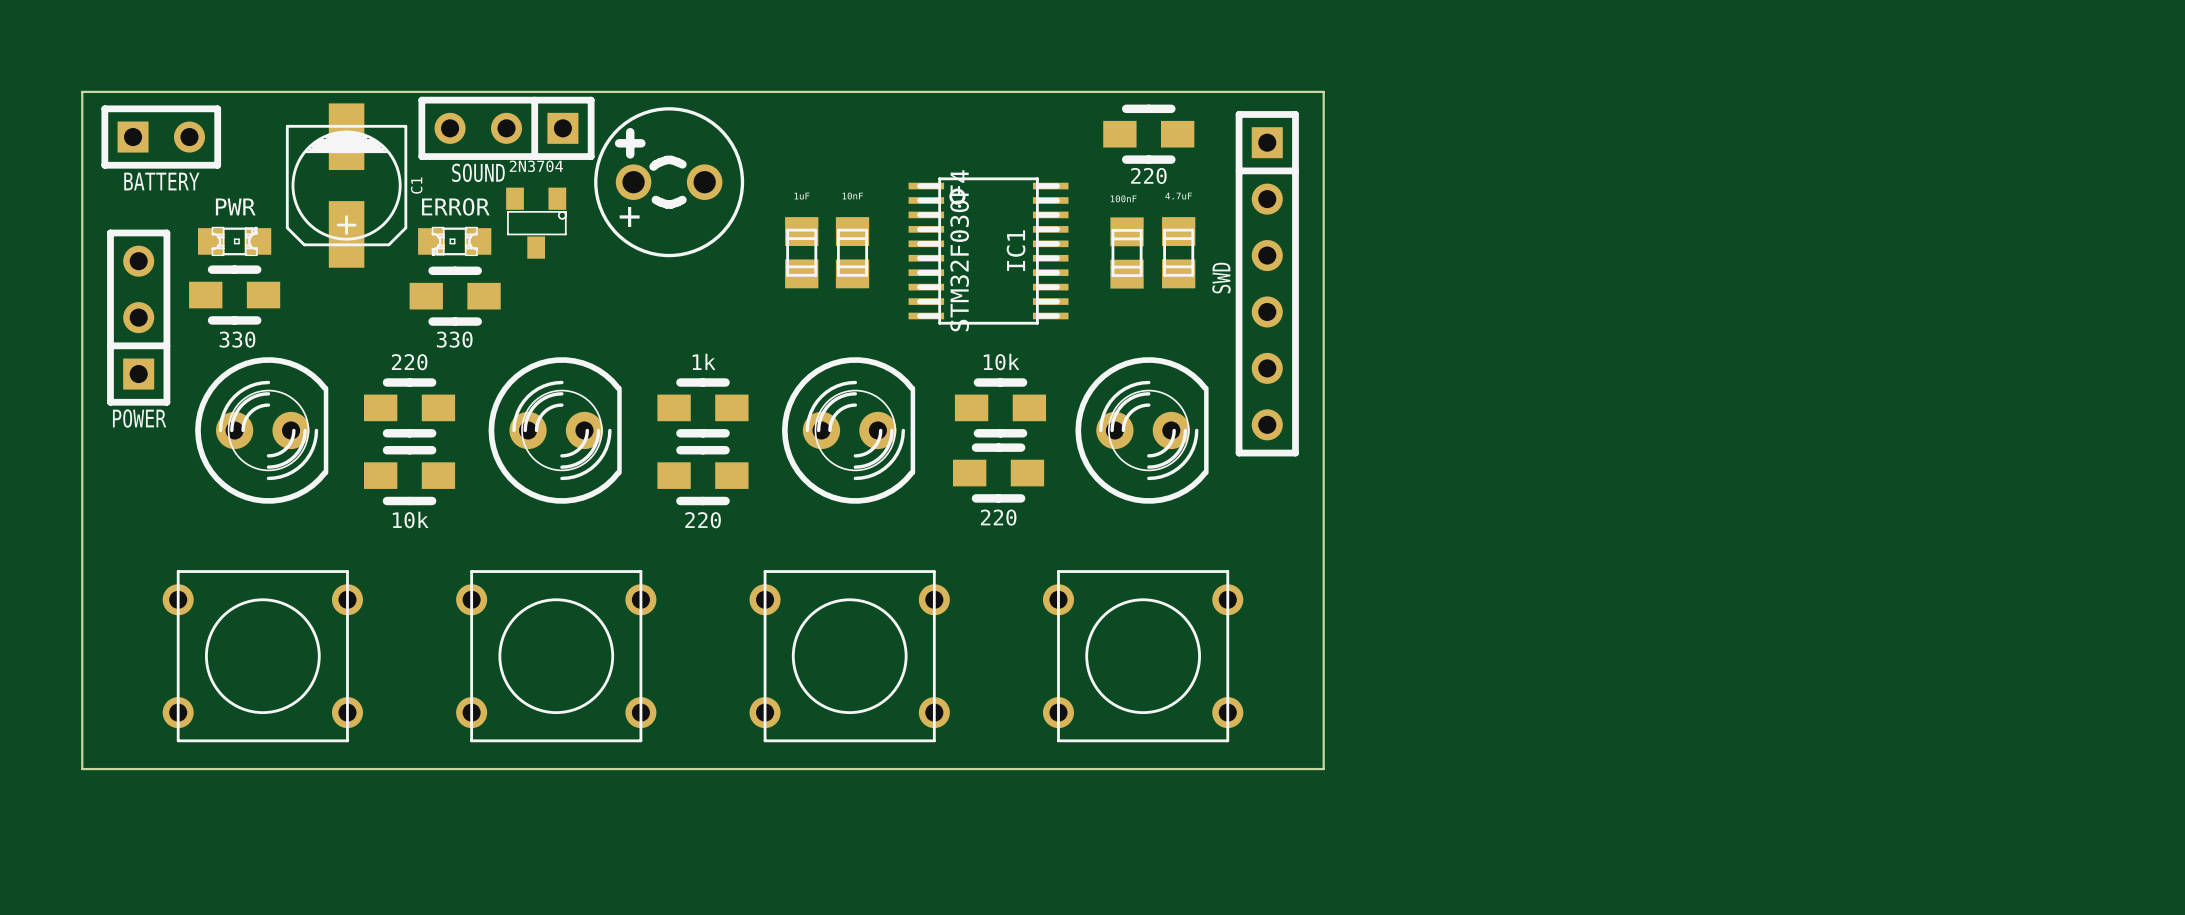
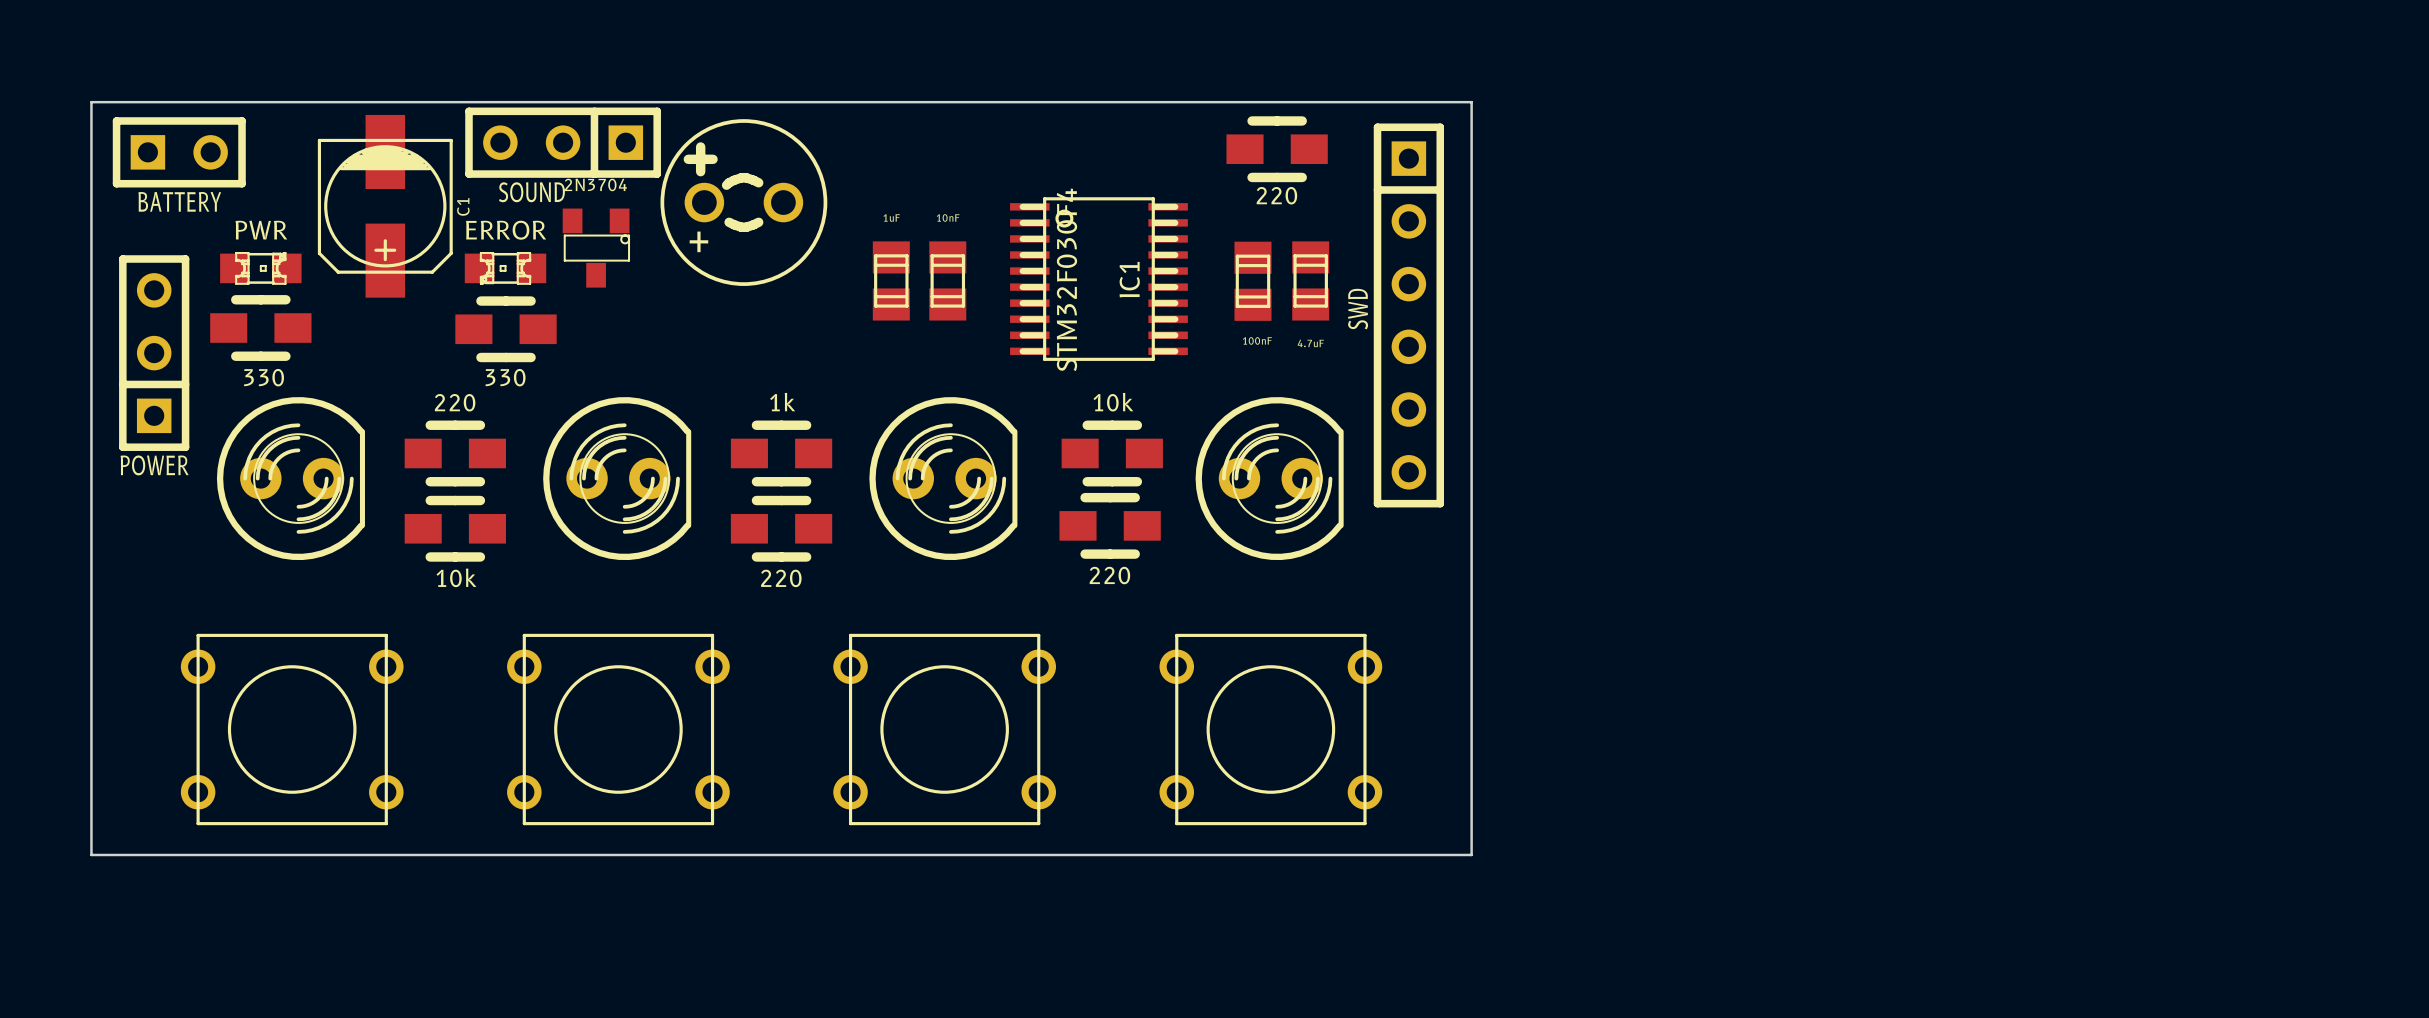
part rotation: 0° (1178, 252) -> 180° (1310, 280)
part rotation: 0° (1127, 253) -> 180° (1252, 281)

